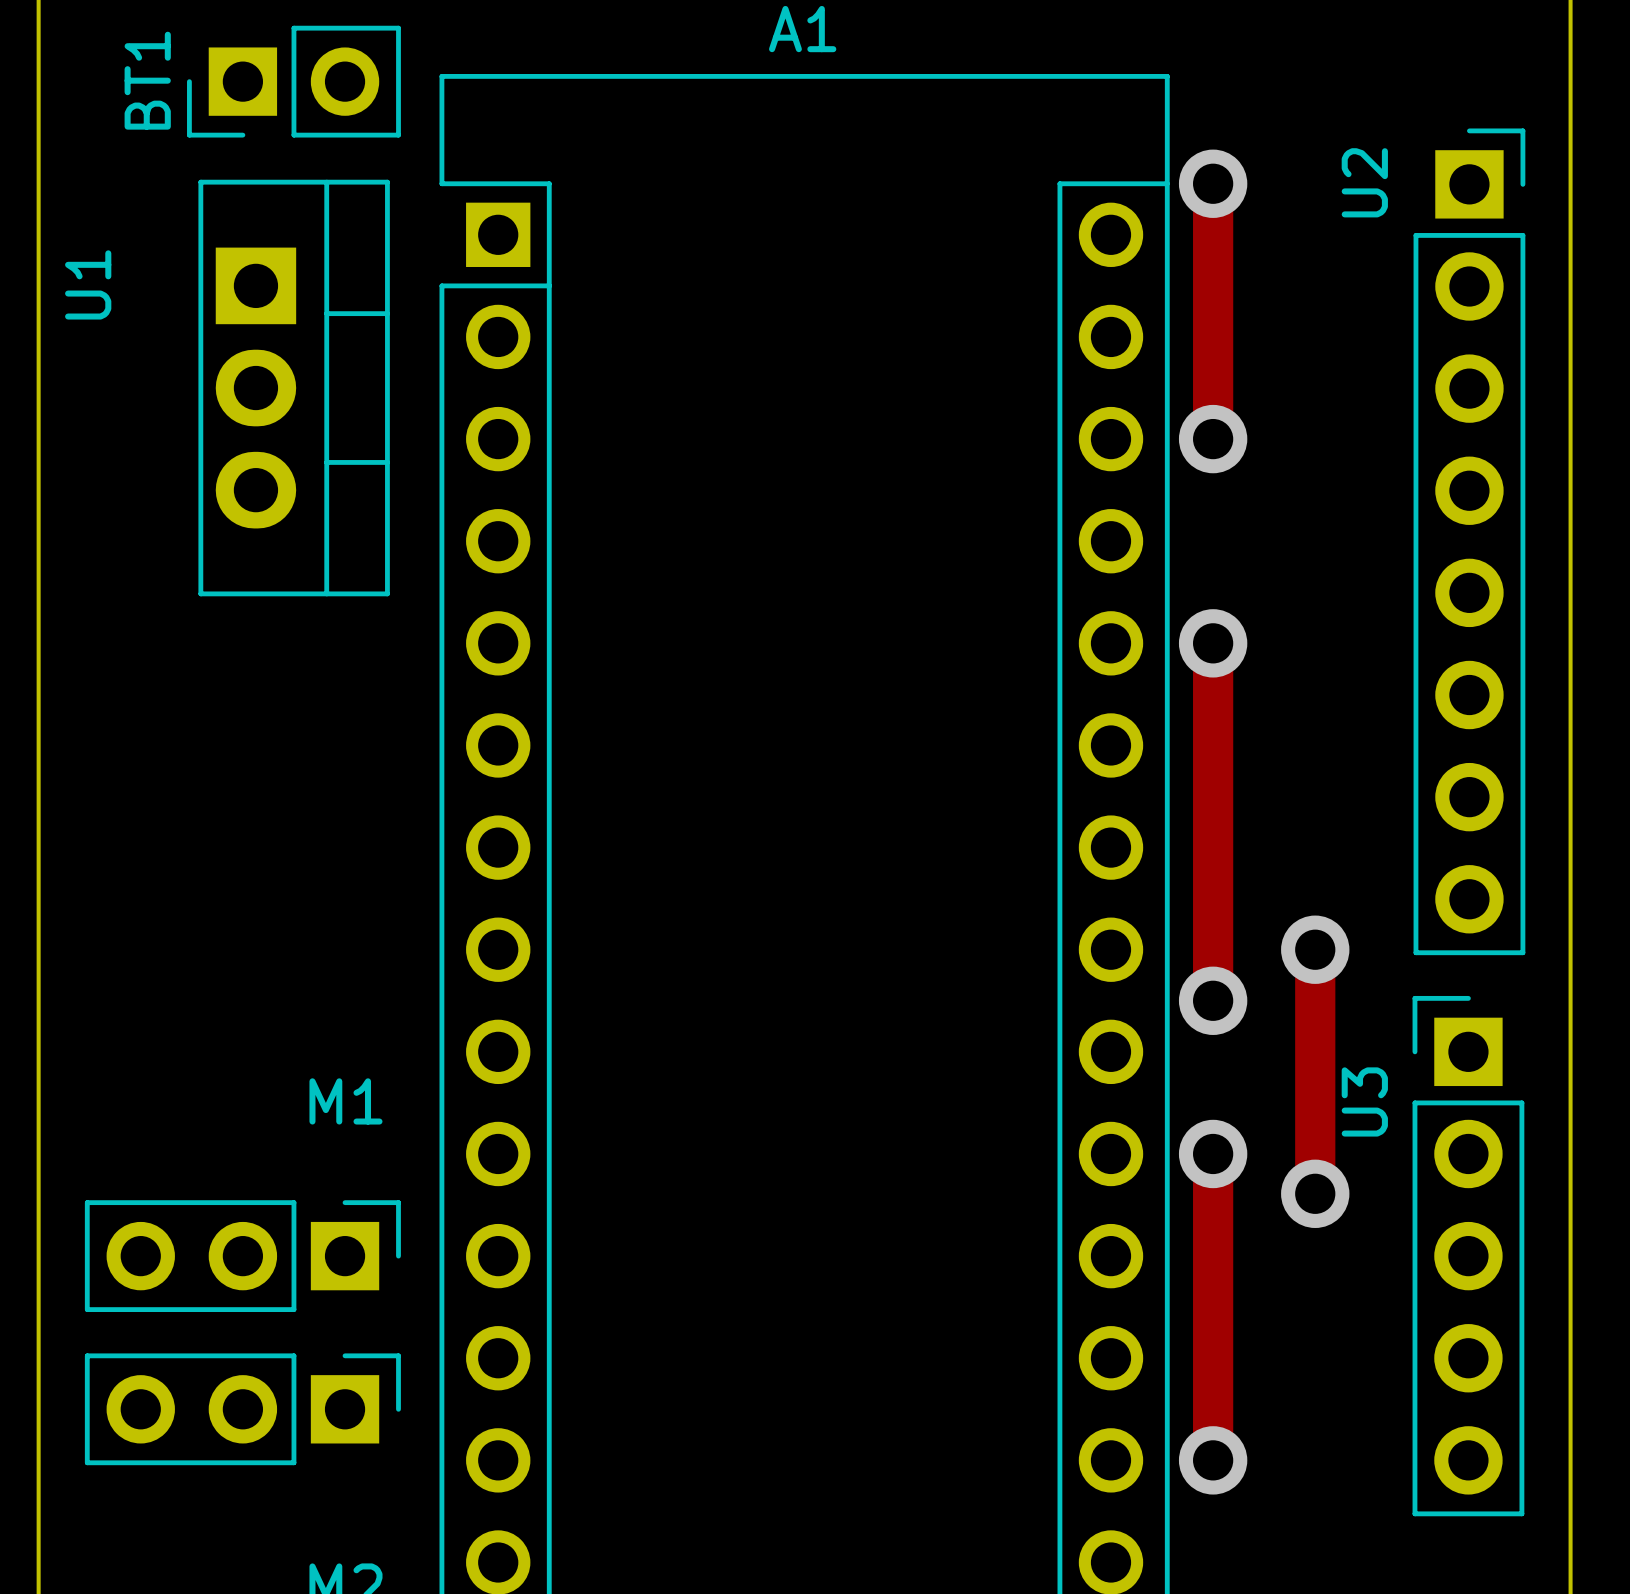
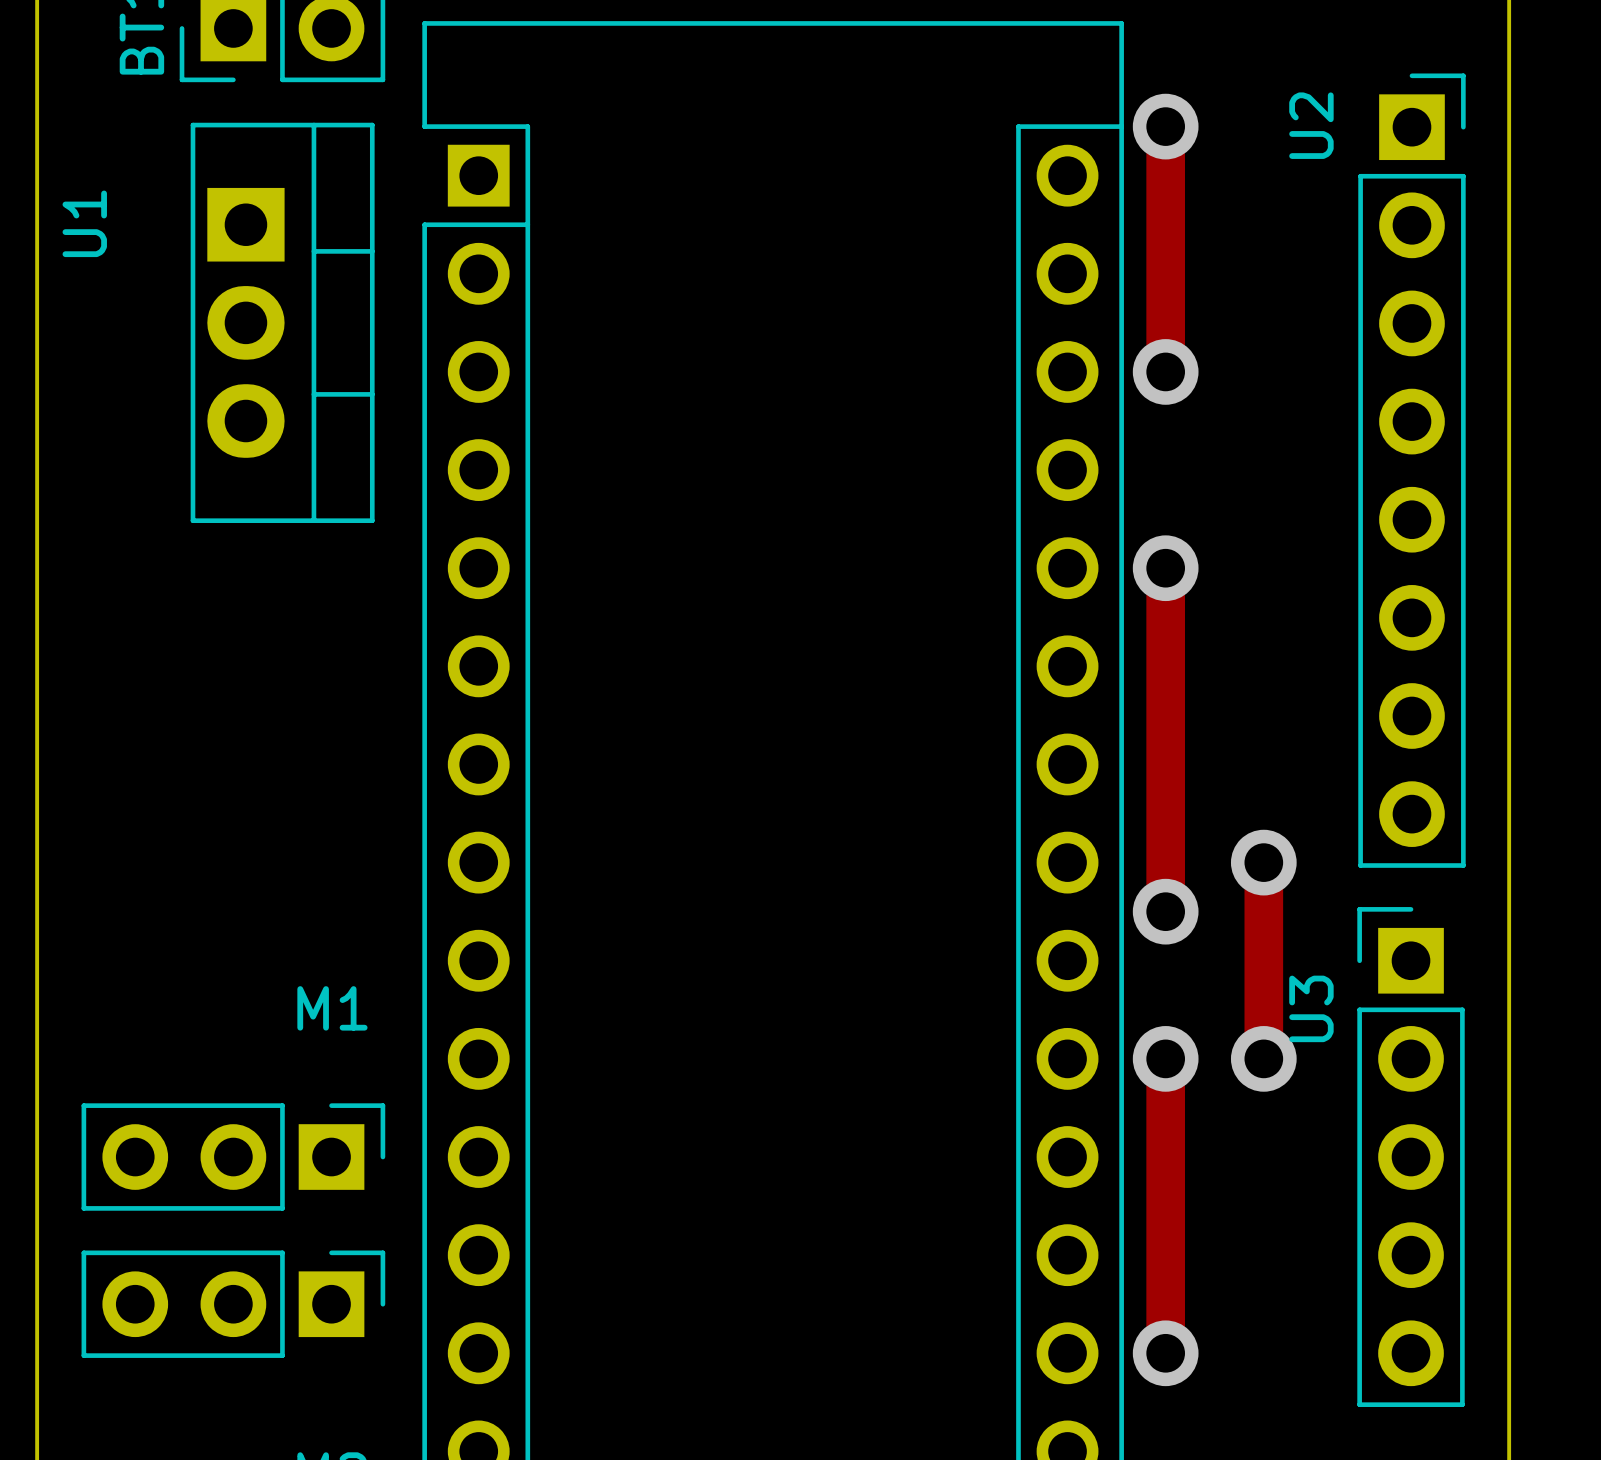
via position: (1315, 1193) -> (1263, 1058)

